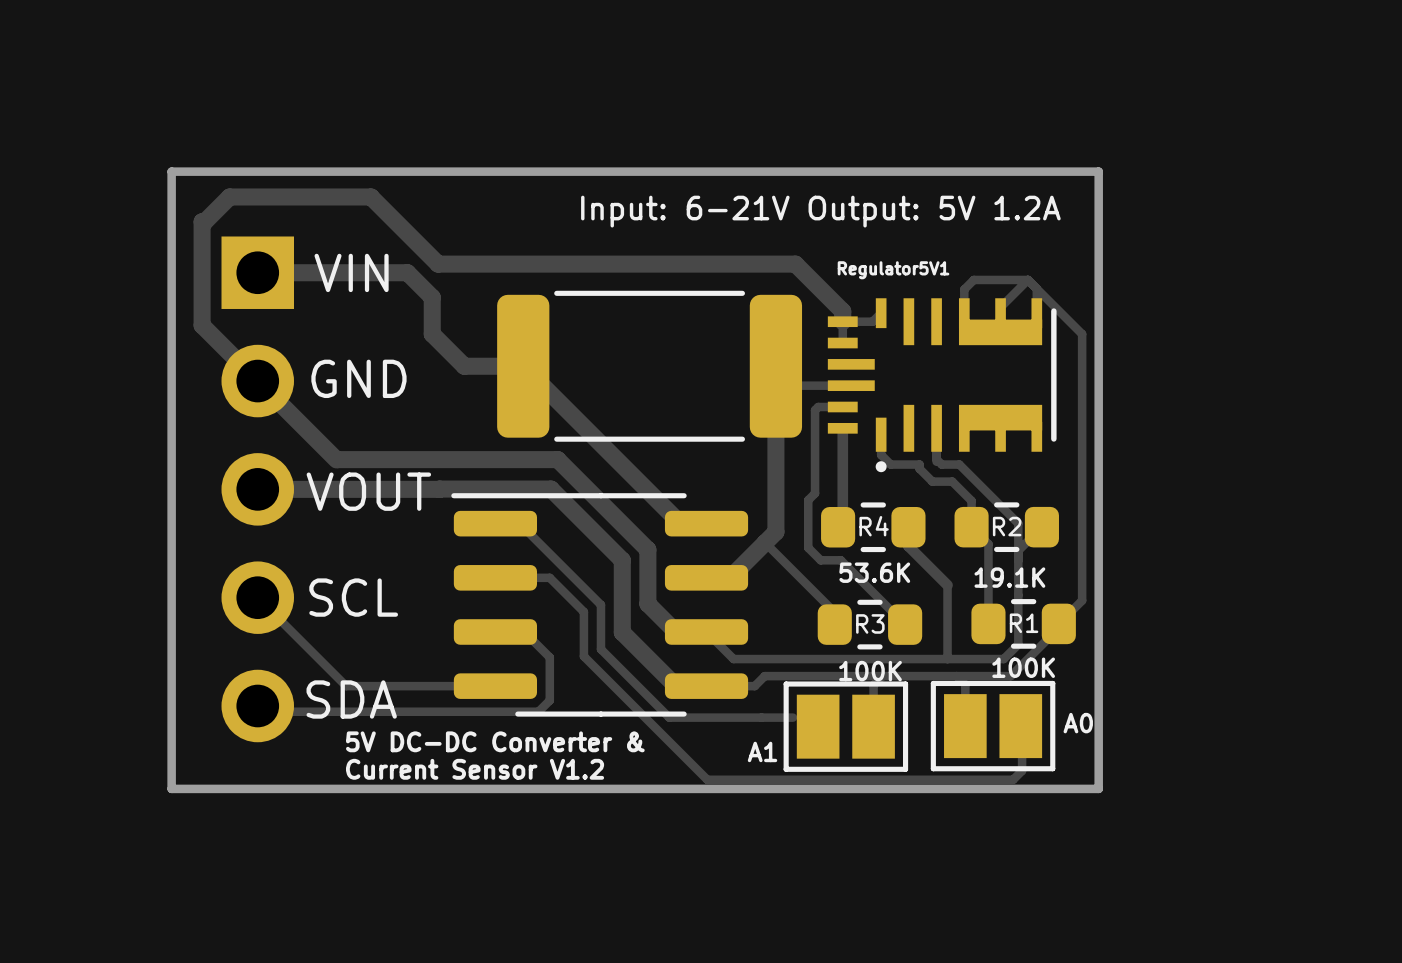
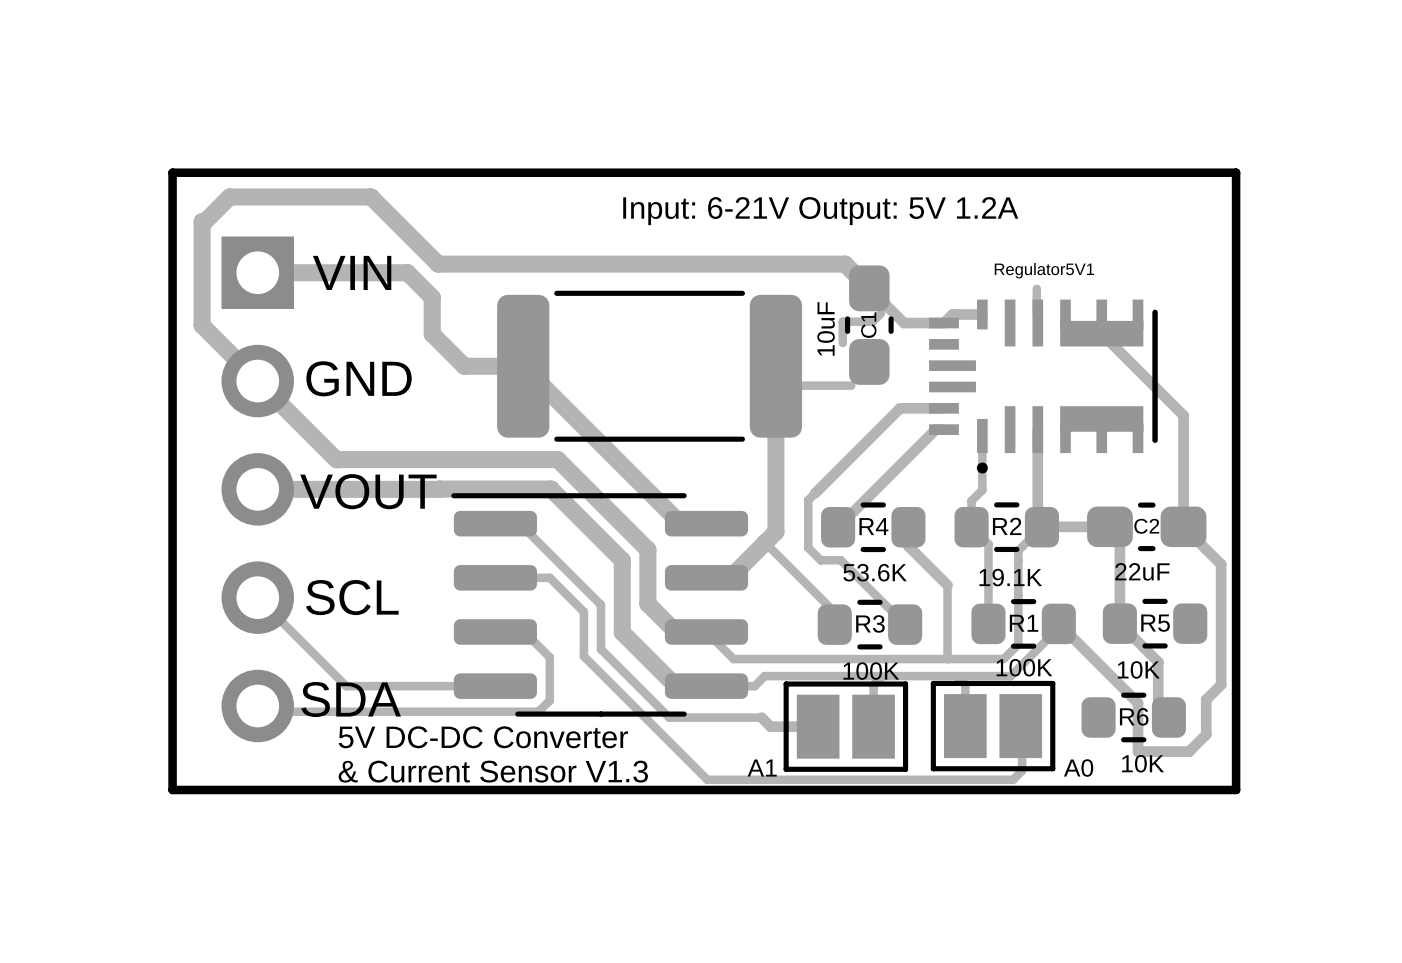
board edge: (171, 171) (1098, 171) (1098, 788) (171, 788) (171, 171) -> (172, 172) (172, 789) (1236, 789) (1236, 172) (172, 172)
track: (795, 264) (842, 311) (842, 321) -> (795, 264) (845, 264) (903, 323) (943, 323) (952, 314) (982, 314)
Regulator5V1 name position: Regulator5V1 (893, 270) -> Regulator5V1 (1044, 270)
track: (1027, 279) (1082, 334) (1082, 600) (1058, 623) -> (1101, 333) (1183, 415) (1183, 526) (1221, 564) (1221, 684) (1206, 699) (1206, 734) (1189, 751) (1138, 751) (1138, 703) (1058, 623)
track: (1027, 279) (973, 279) (964, 289) (964, 313) -> none
track: (1027, 279) (1000, 307) (1000, 313) -> none
C1: none -> 10uF (869, 325)
Regulator5V1 position: (942, 385) -> (1043, 386)
track: (842, 406) (818, 406) (815, 410) (815, 493) -> (943, 408) (900, 408) (815, 493)
track: (842, 428) (842, 522) -> (943, 429) (935, 429) (842, 522)
track: none -> (1037, 429) (1037, 523) (1041, 527)
track: (881, 434) (881, 454) (890, 464) (919, 464) (919, 468) (932, 481) (952, 481) (971, 500) -> (982, 436) (982, 490) (971, 500)
track: (936, 459) (941, 464) (959, 464) (1018, 523) (1018, 550) -> none
track: none -> (1042, 526) (1109, 526) (1119, 536) (1119, 623) (1158, 662) (1158, 706) (1168, 717)
C2: none -> 22uF (1146, 526)
R5: none -> 10K (1155, 623)
track: (761, 717) (792, 717) -> (761, 717) (770, 726) (818, 726)
R6: none -> 10K (1133, 717)
A0 name position: A0 (1078, 723) -> A0 (1078, 768)
text: 5V DC-DC Converter & (495, 741) -> 5V DC-DC Converter (483, 737)
part value position: A1 (762, 751) -> A1 (762, 768)
text: Current Sensor V1.2 (475, 769) -> & Current Sensor V1.3 (493, 771)

